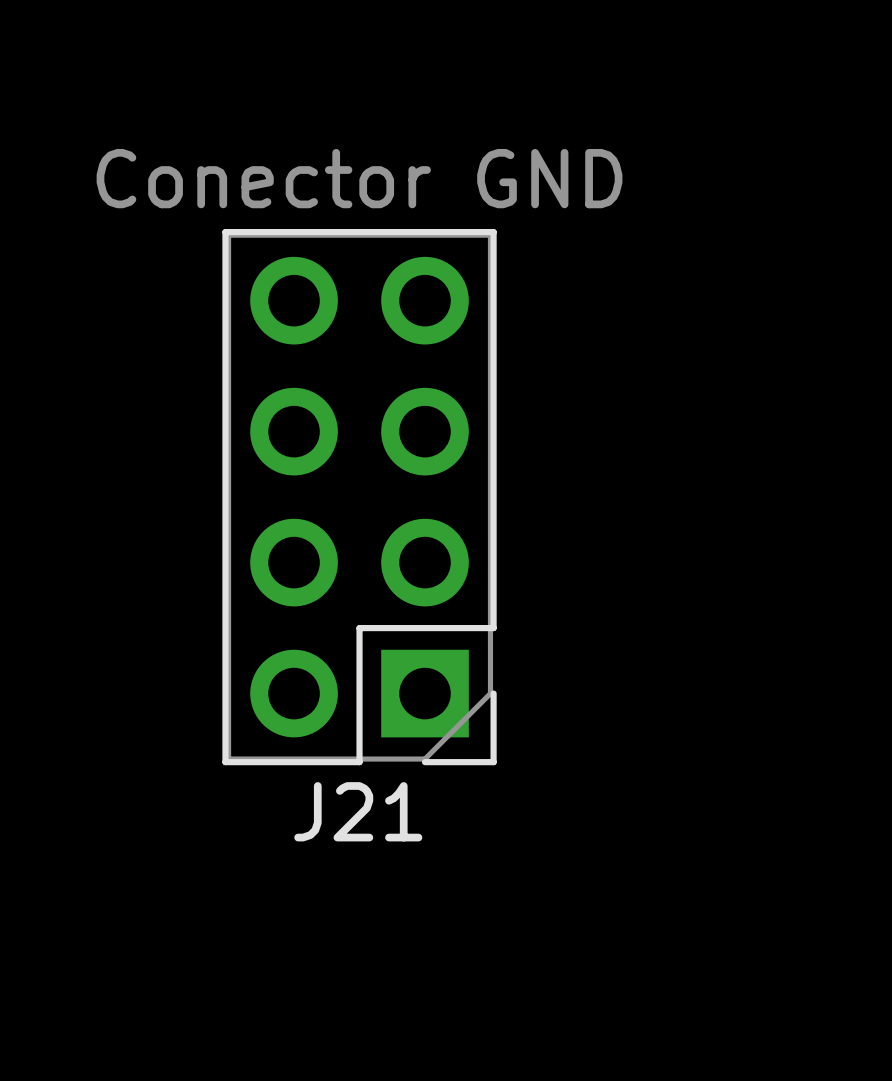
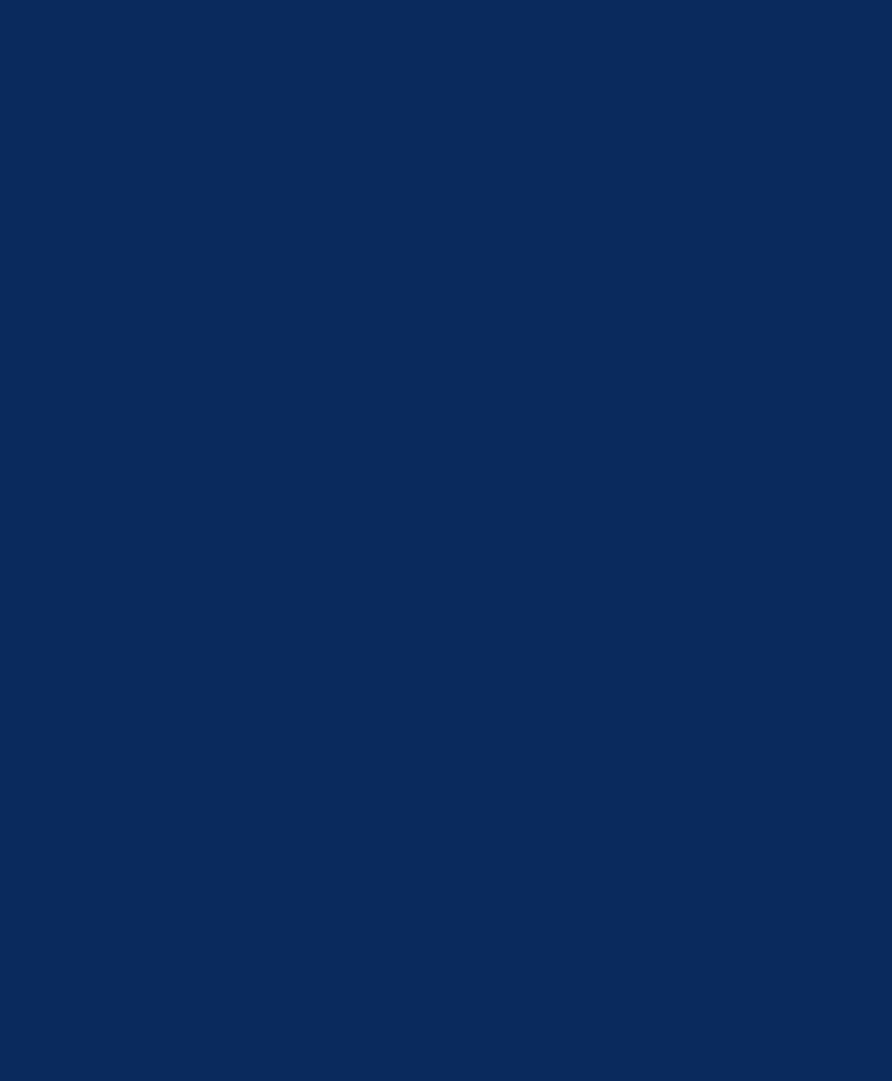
J21: Conector GND (359, 497) -> none

